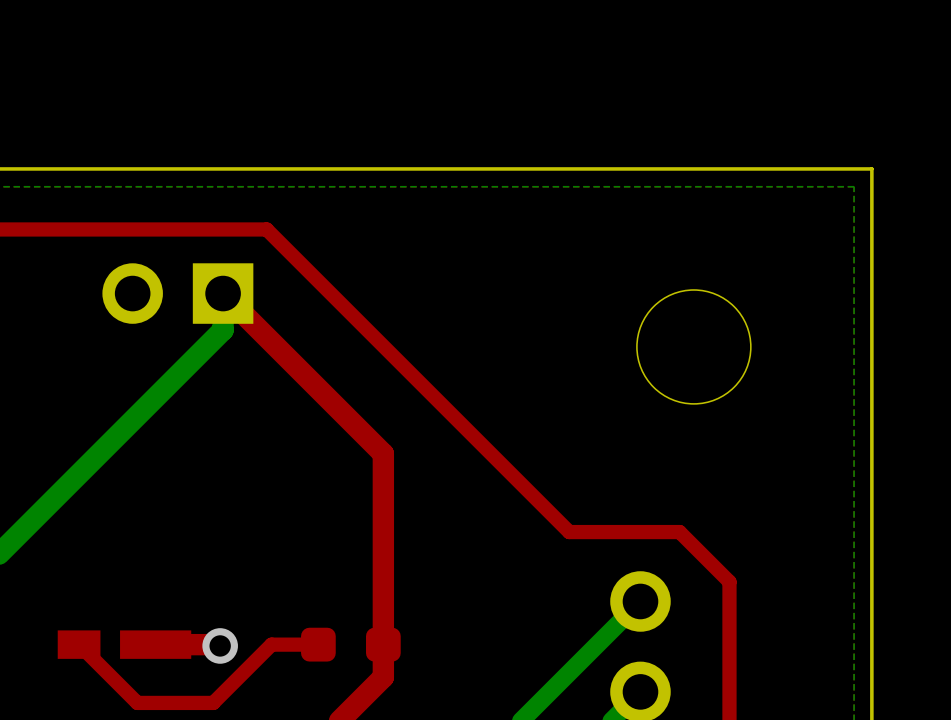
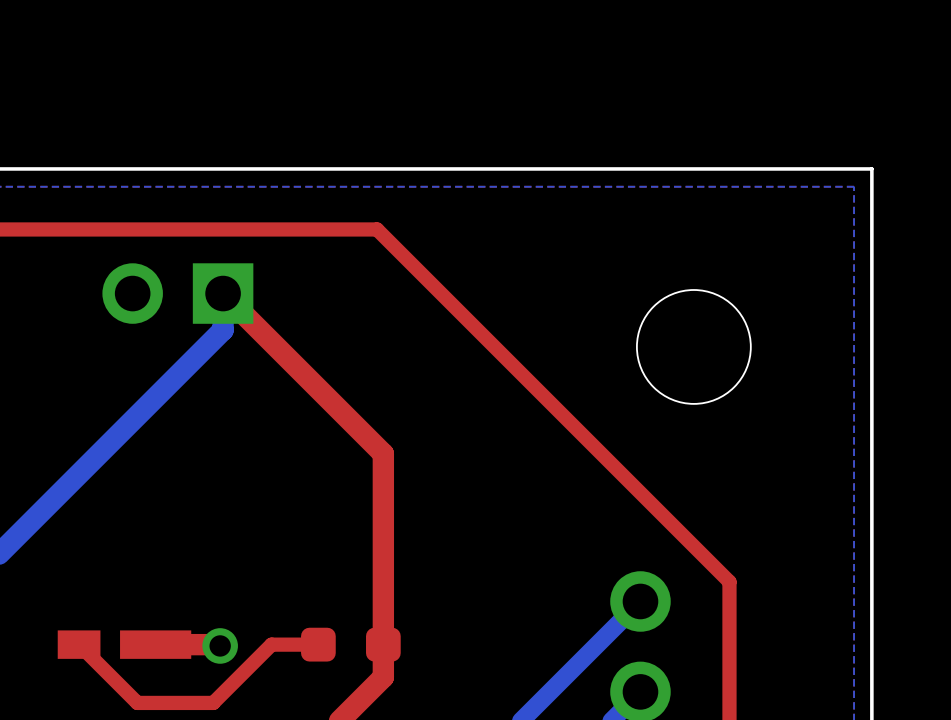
top track: (266, 229) (569, 532) (679, 532) -> (266, 229) (377, 229) (679, 532)

